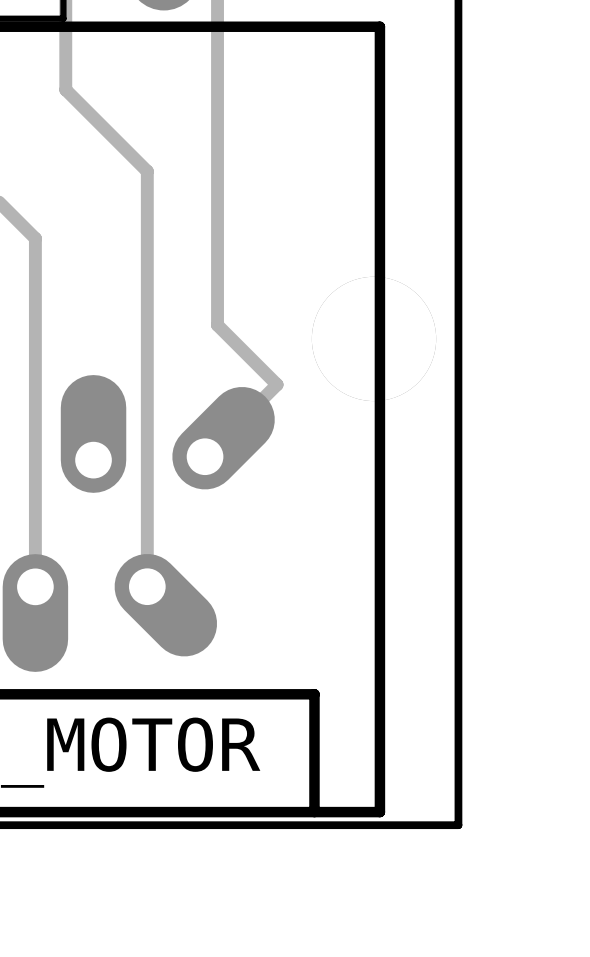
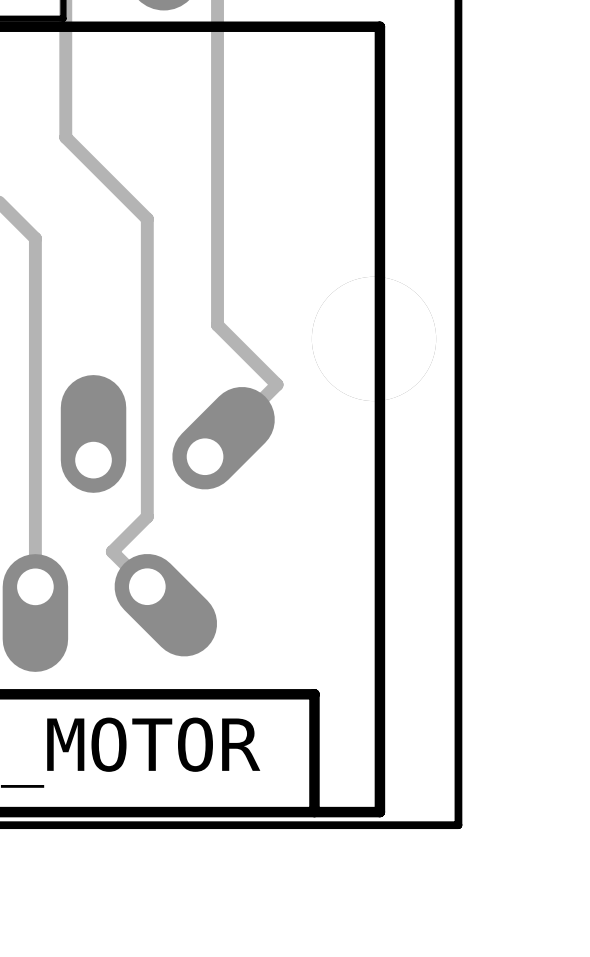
track: (65, 89) (147, 171) (147, 219) -> (65, 89) (65, 137) (147, 219)
track: (147, 516) (147, 586) -> (147, 516) (112, 551) (147, 586)

